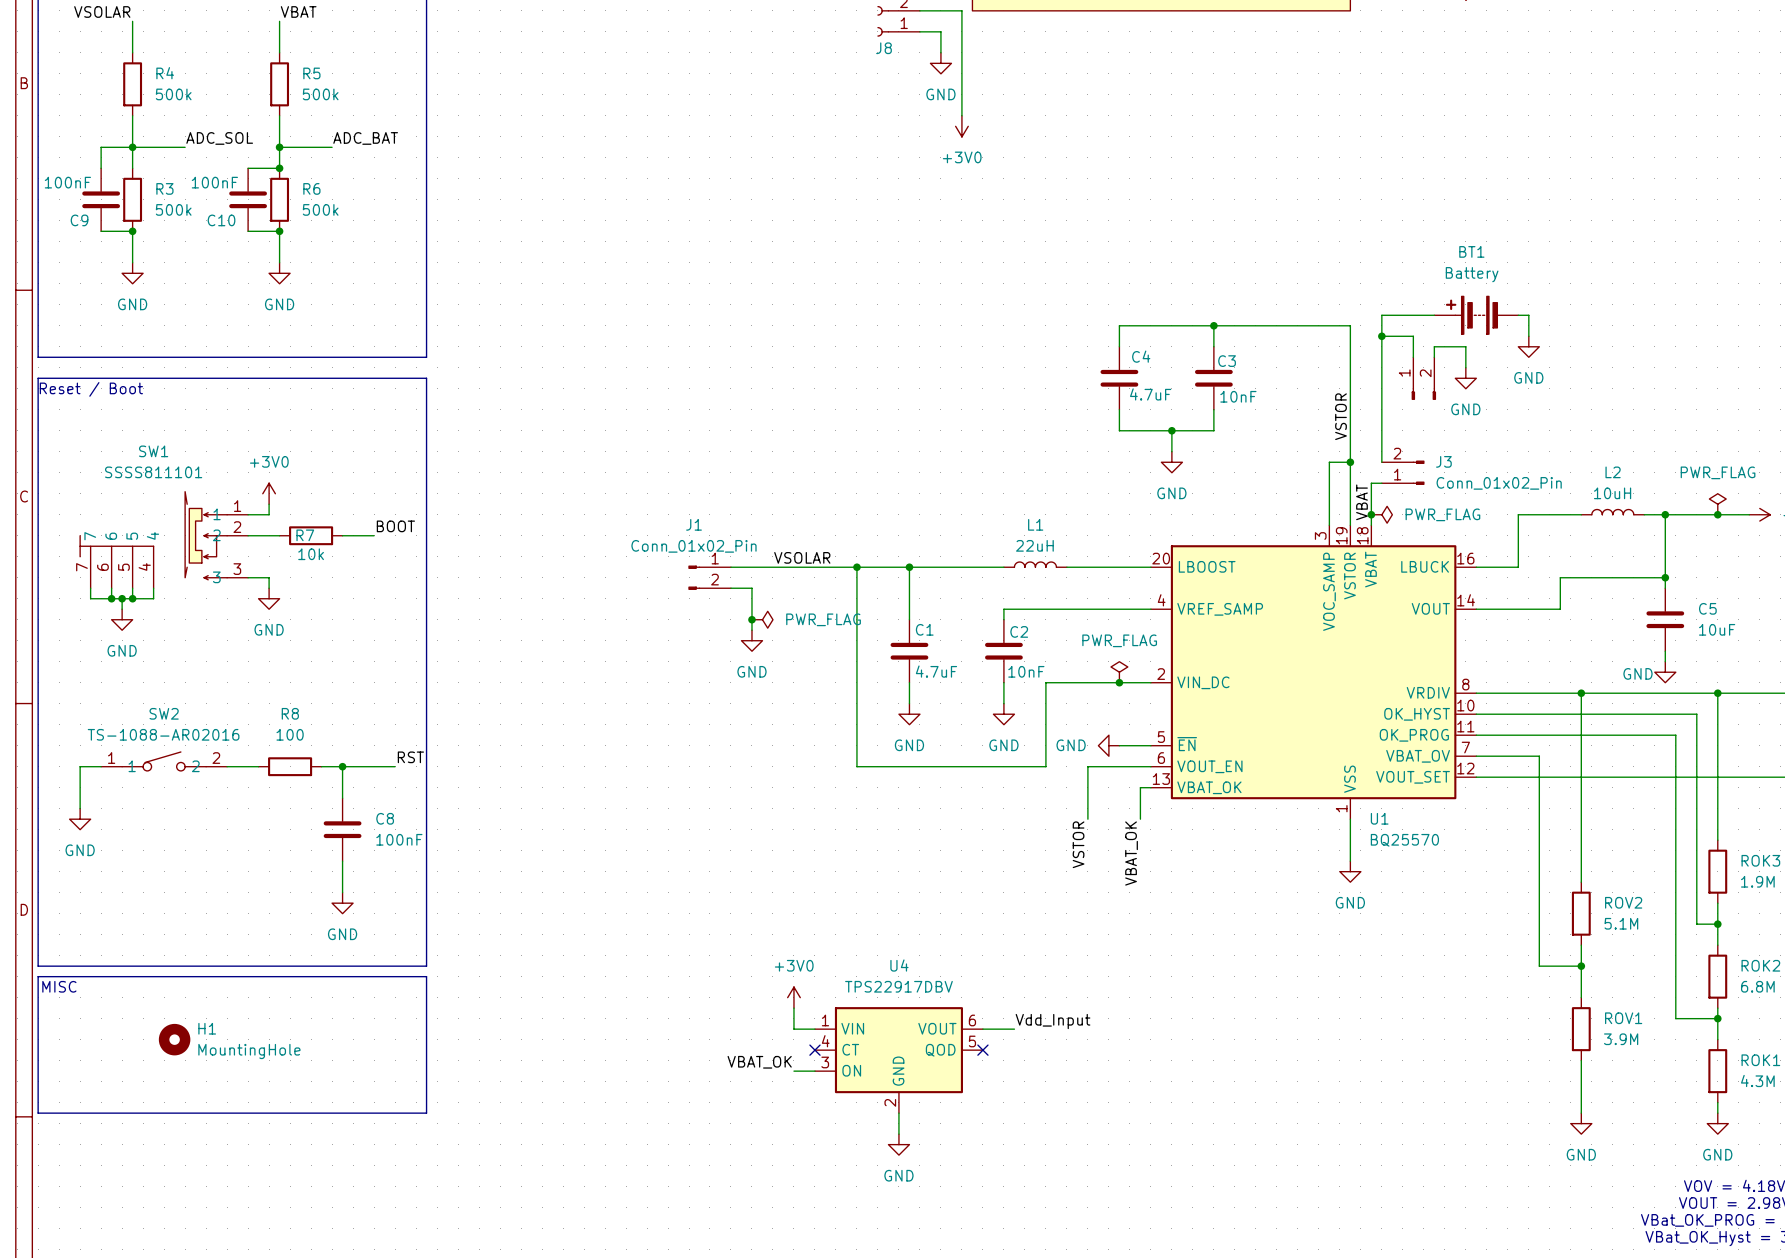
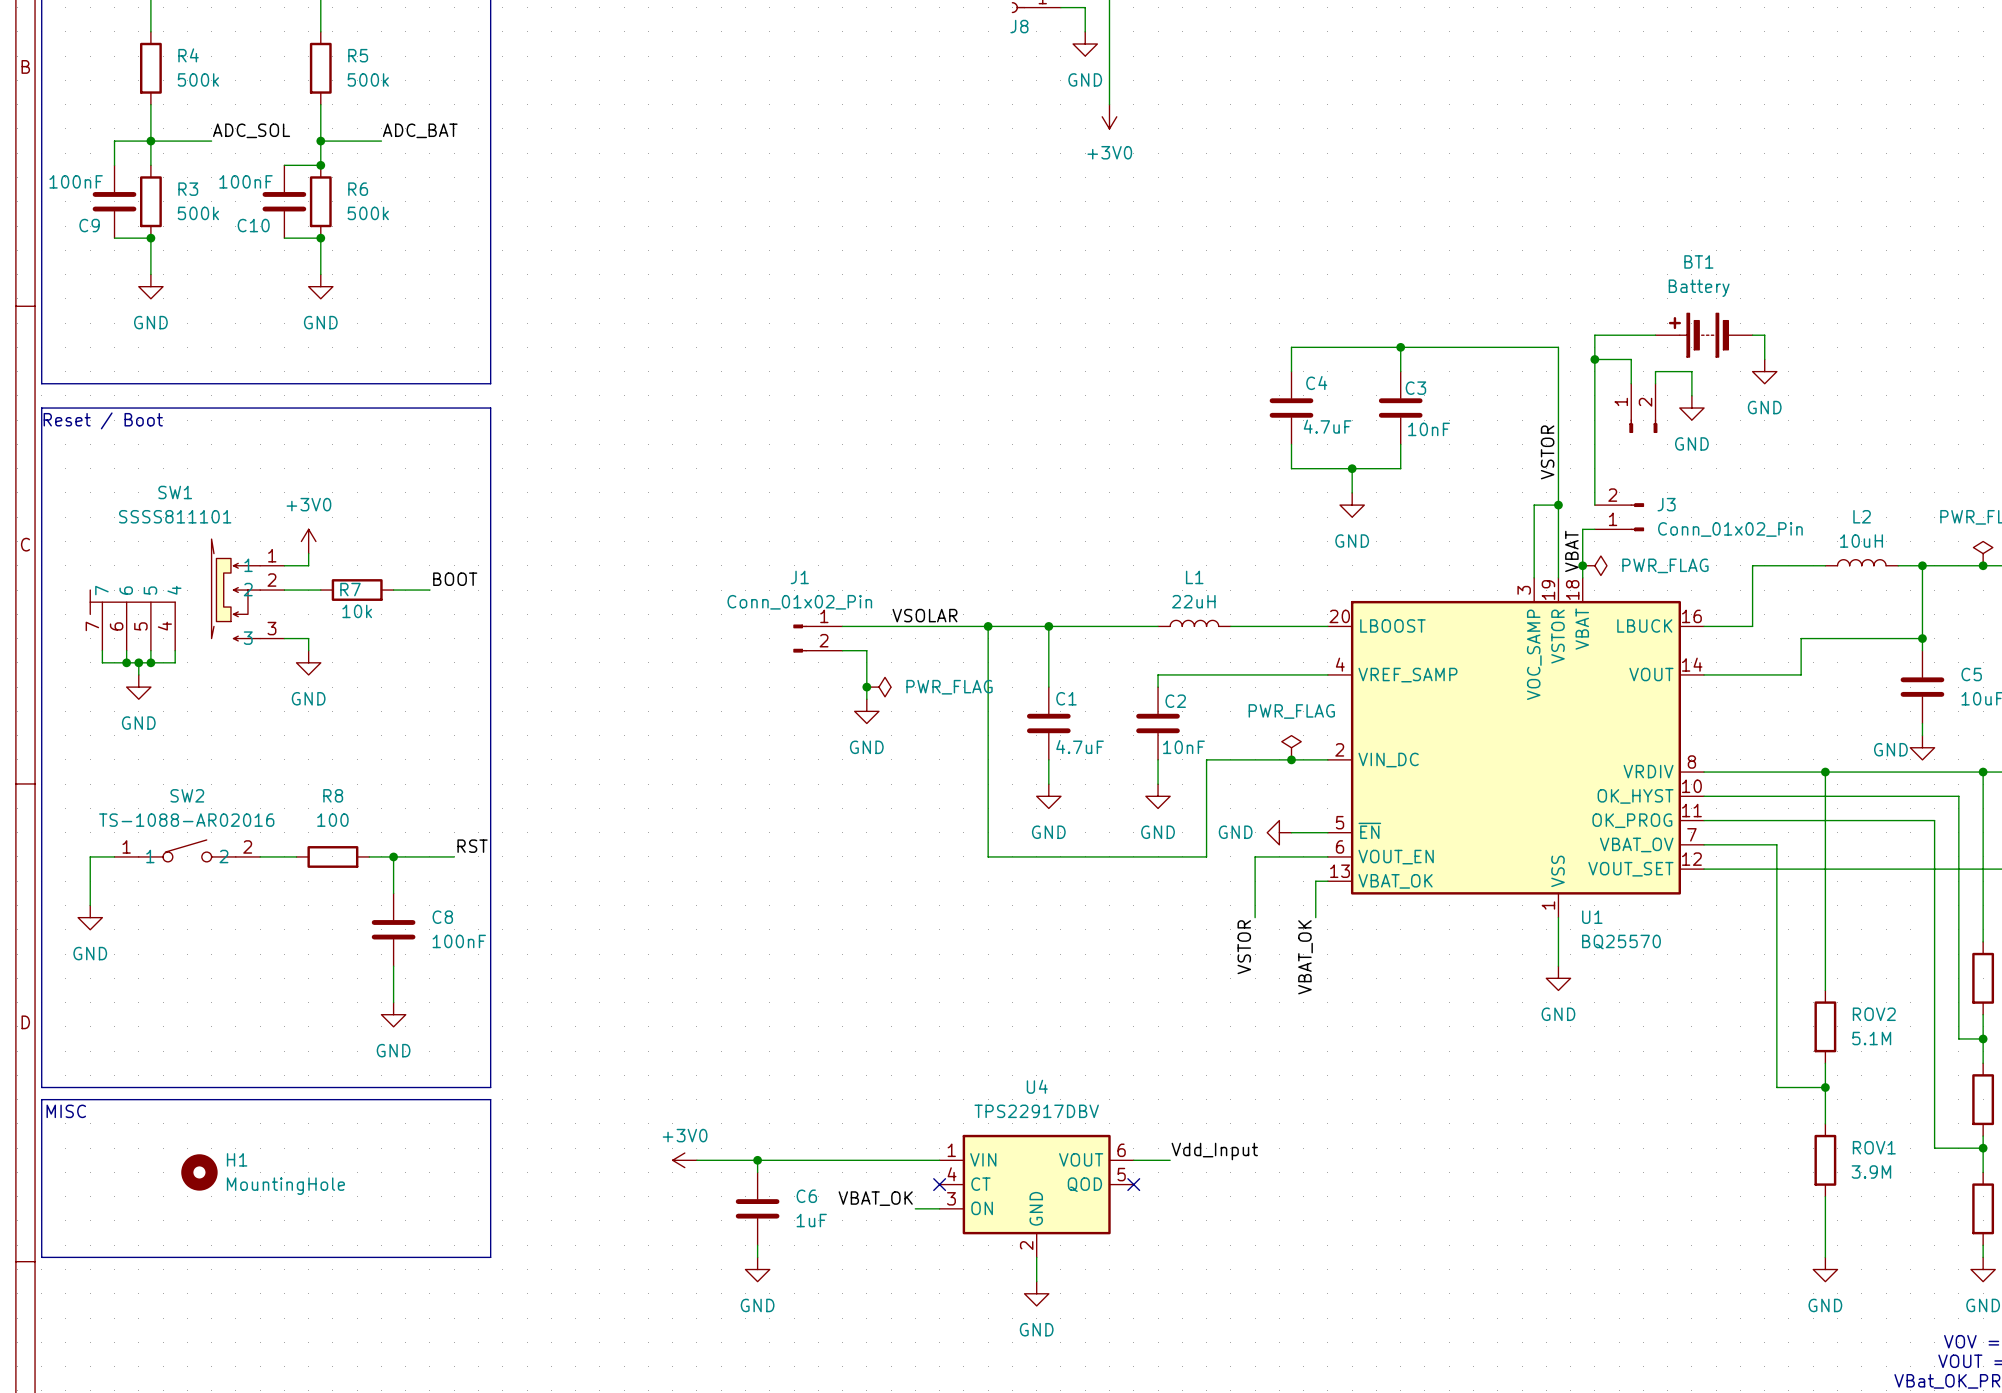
power symbol rotation: 0° (793, 997) -> 90° counterclockwise (684, 1160)
power symbol position: +3V0 (793, 997) -> +3V0 (684, 1160)
wire: (793, 1008) (793, 1029) -> (696, 1160) (915, 1160)
wire: none -> (757, 1160) (757, 1172)
junction: none -> (757, 1160)
C6: none -> 1uF (757, 1208)
wire: none -> (757, 1245) (757, 1257)
power symbol: none -> GND (757, 1269)

